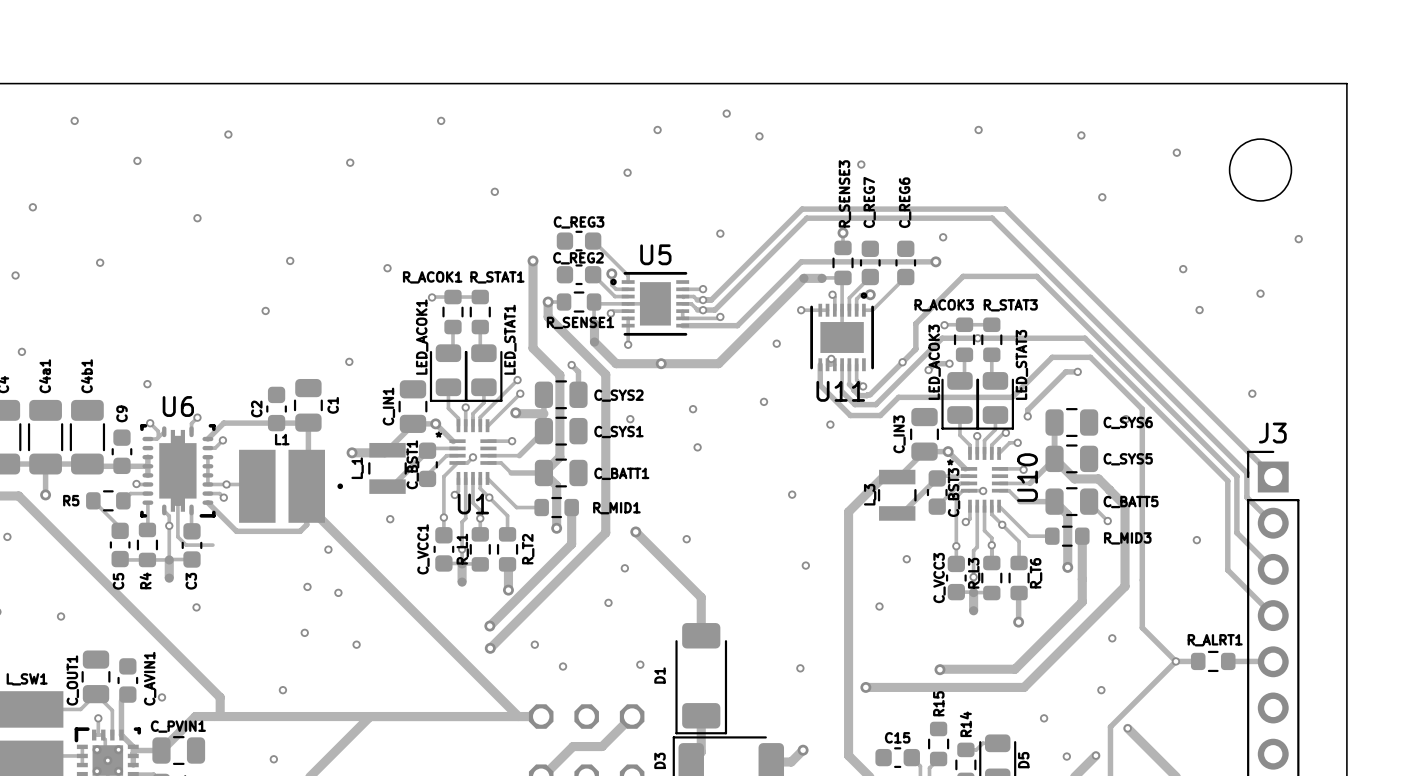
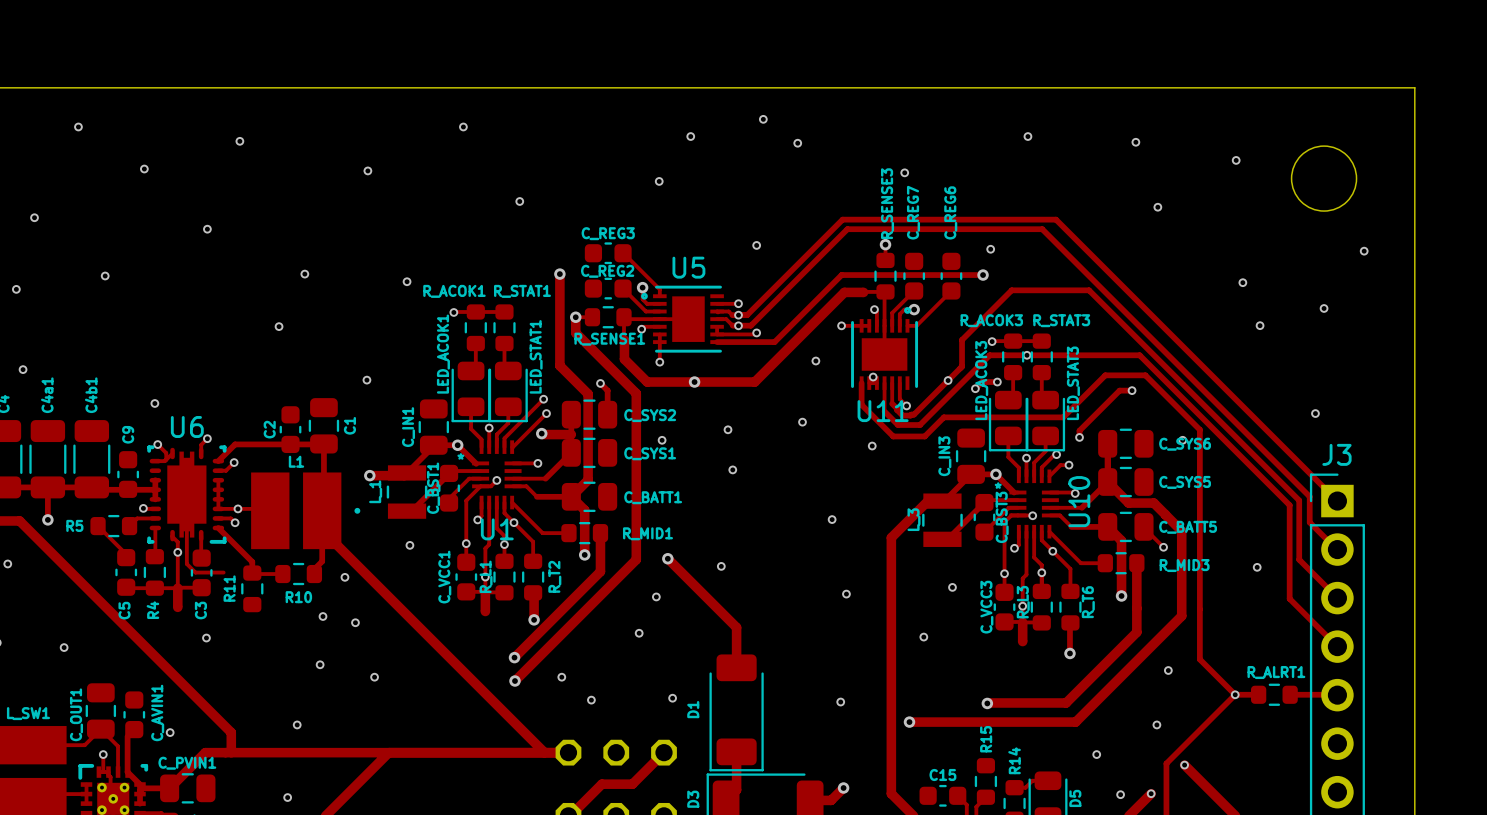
track: (306, 524) (300, 531) (236, 531) -> (282, 574) (253, 574) (252, 561) (248, 558)
track: none -> (322, 551) (322, 561) (314, 569) (314, 574)
R10: none -> (298, 574)
R11: none -> (252, 588)

